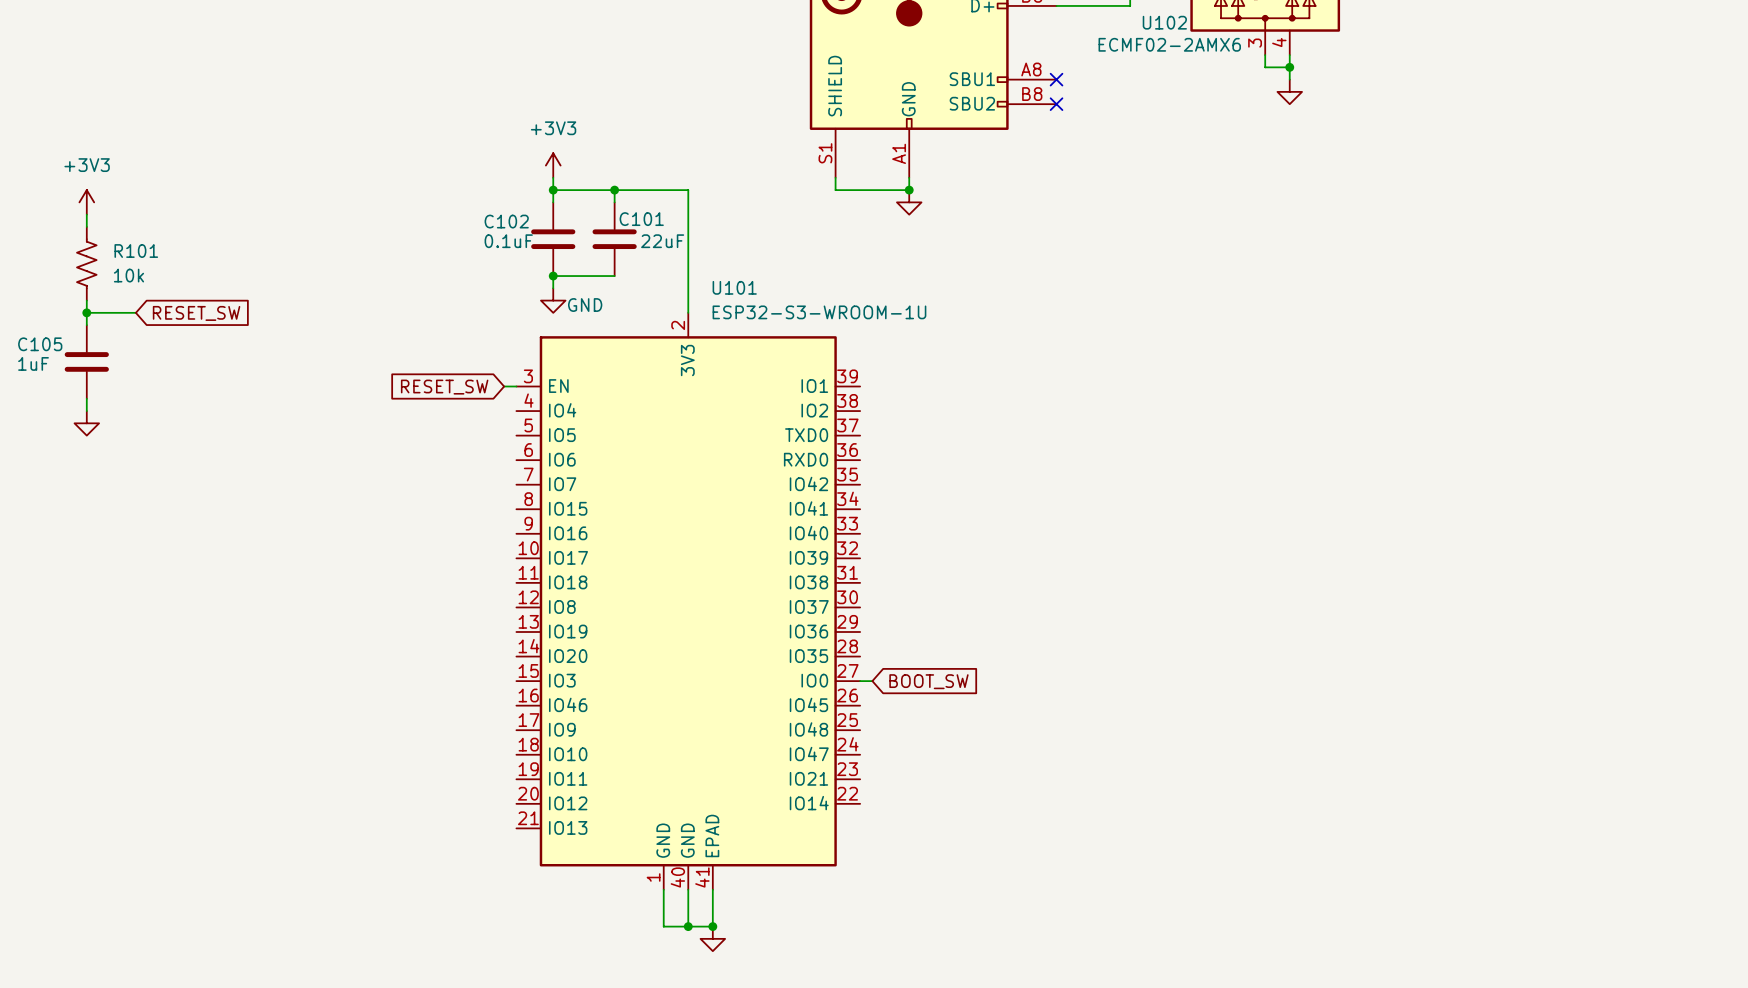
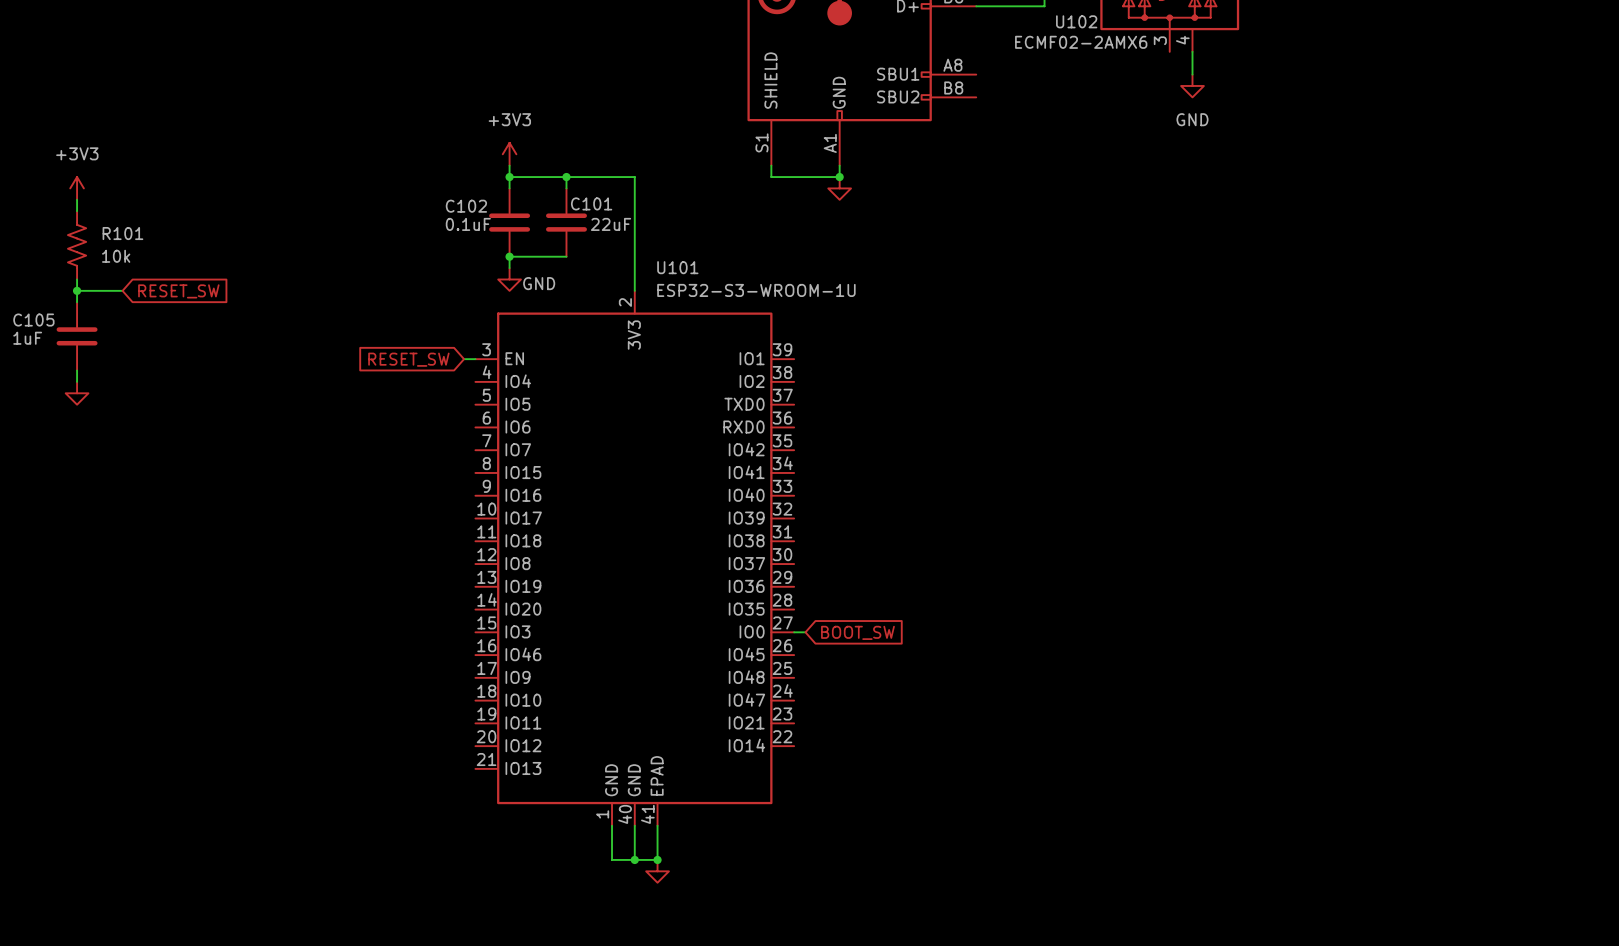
wire: (1265, 55) (1265, 67) (1289, 67) -> none
junction: (1289, 67) -> none
no-connect mark: (1056, 79) -> none
no-connect mark: (1056, 104) -> none
power symbol text: none -> GND (1192, 119)

